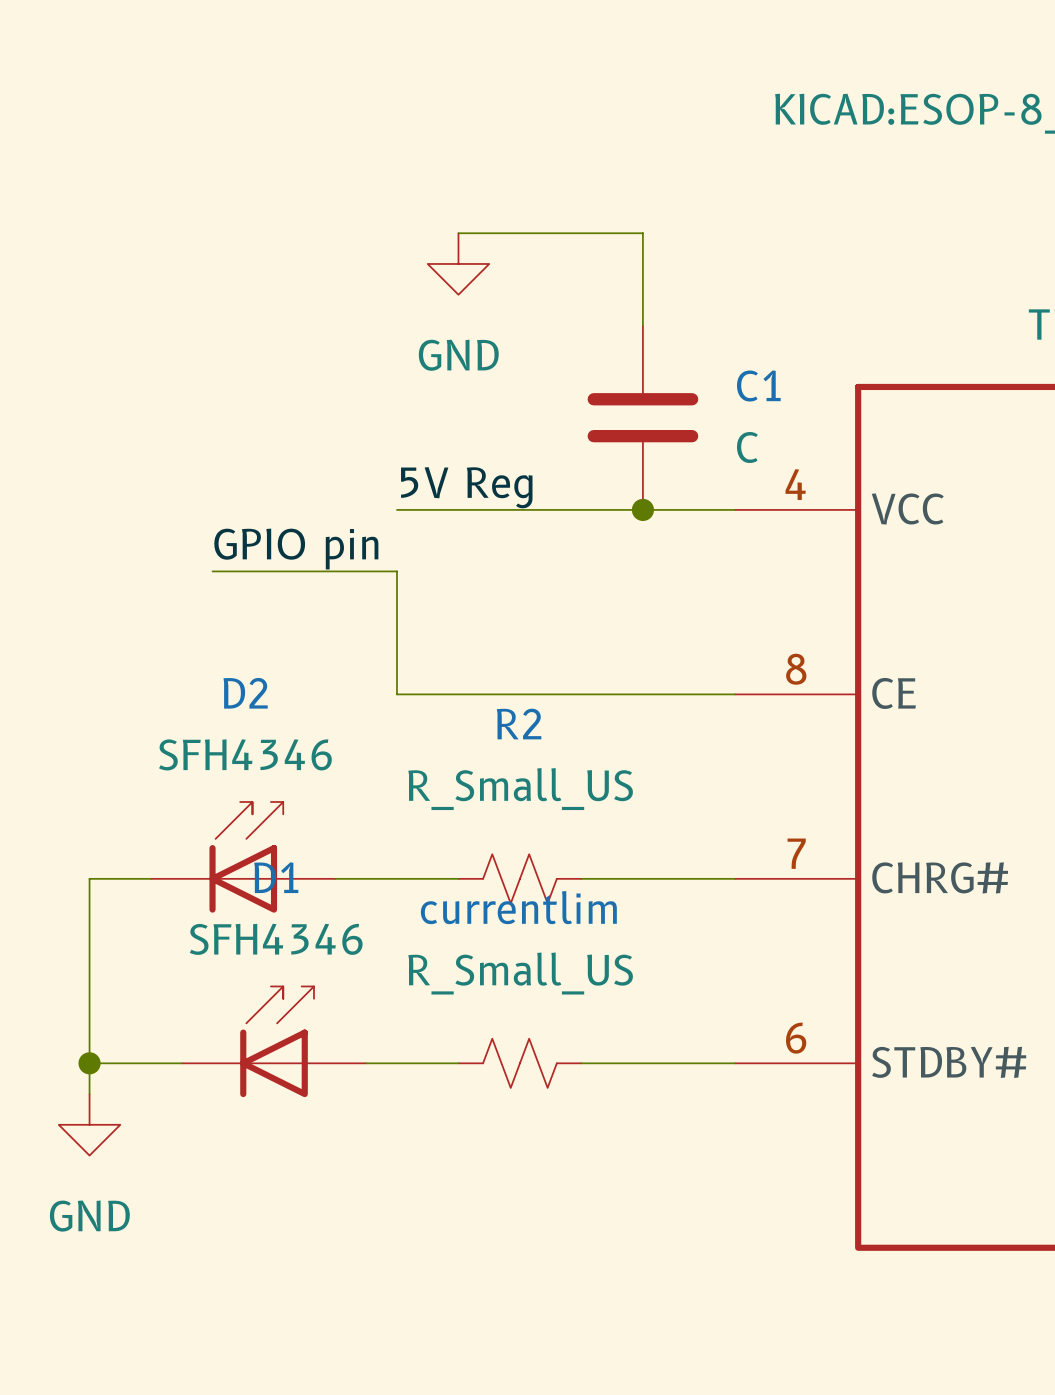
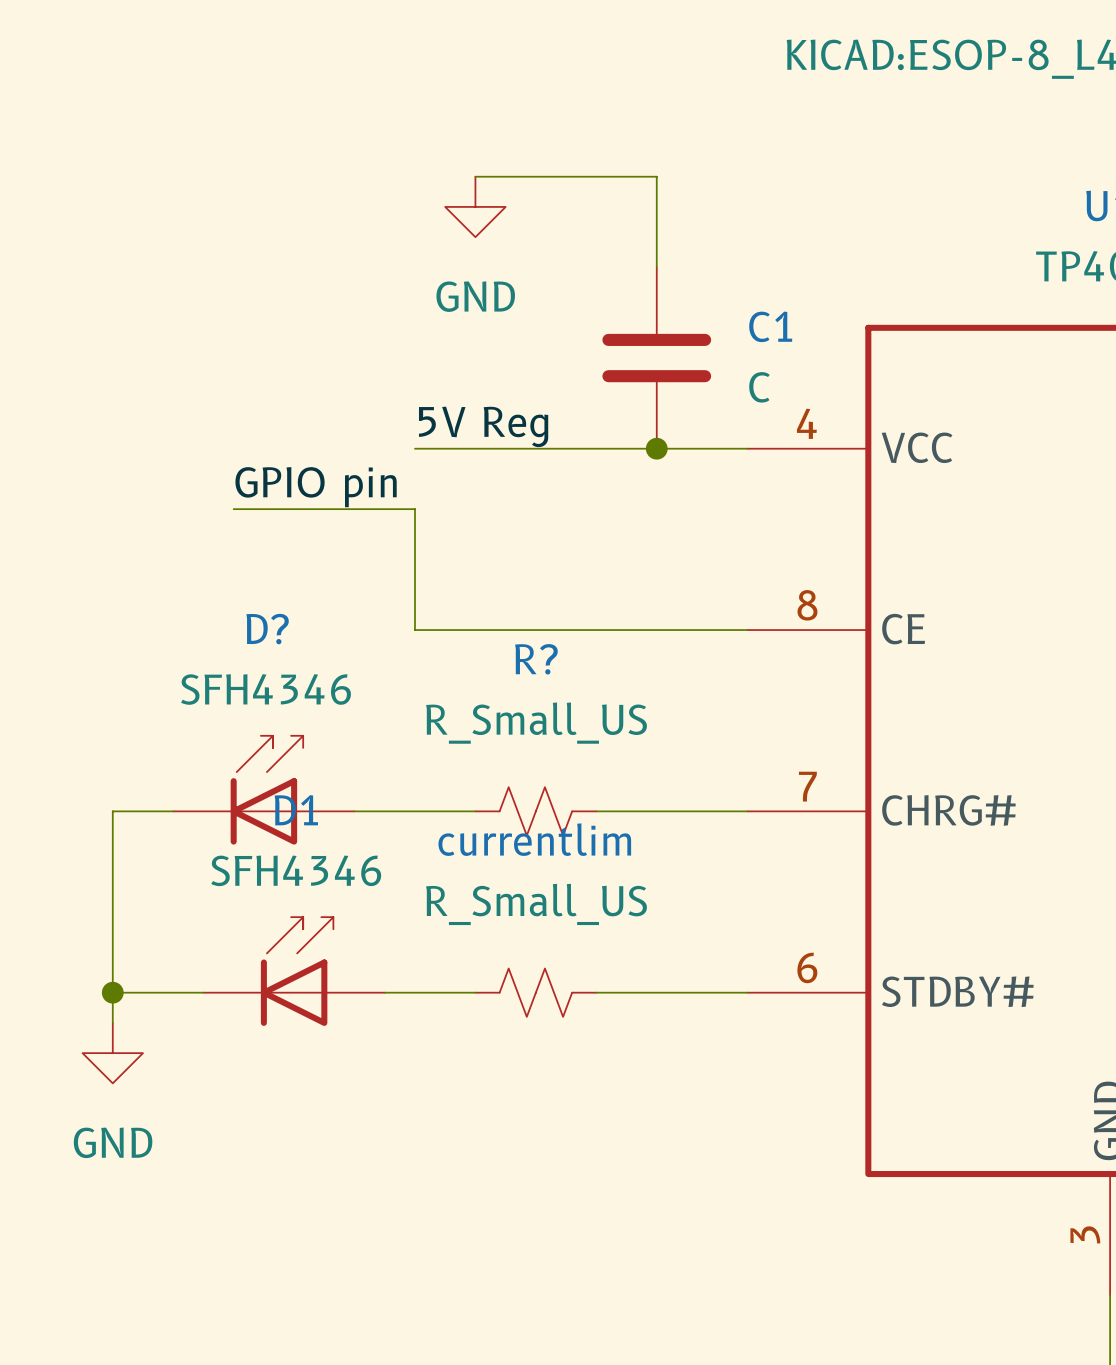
D2 name: D2 (245, 693) -> D? (267, 629)
R2 name: R2 (519, 724) -> R? (536, 659)

